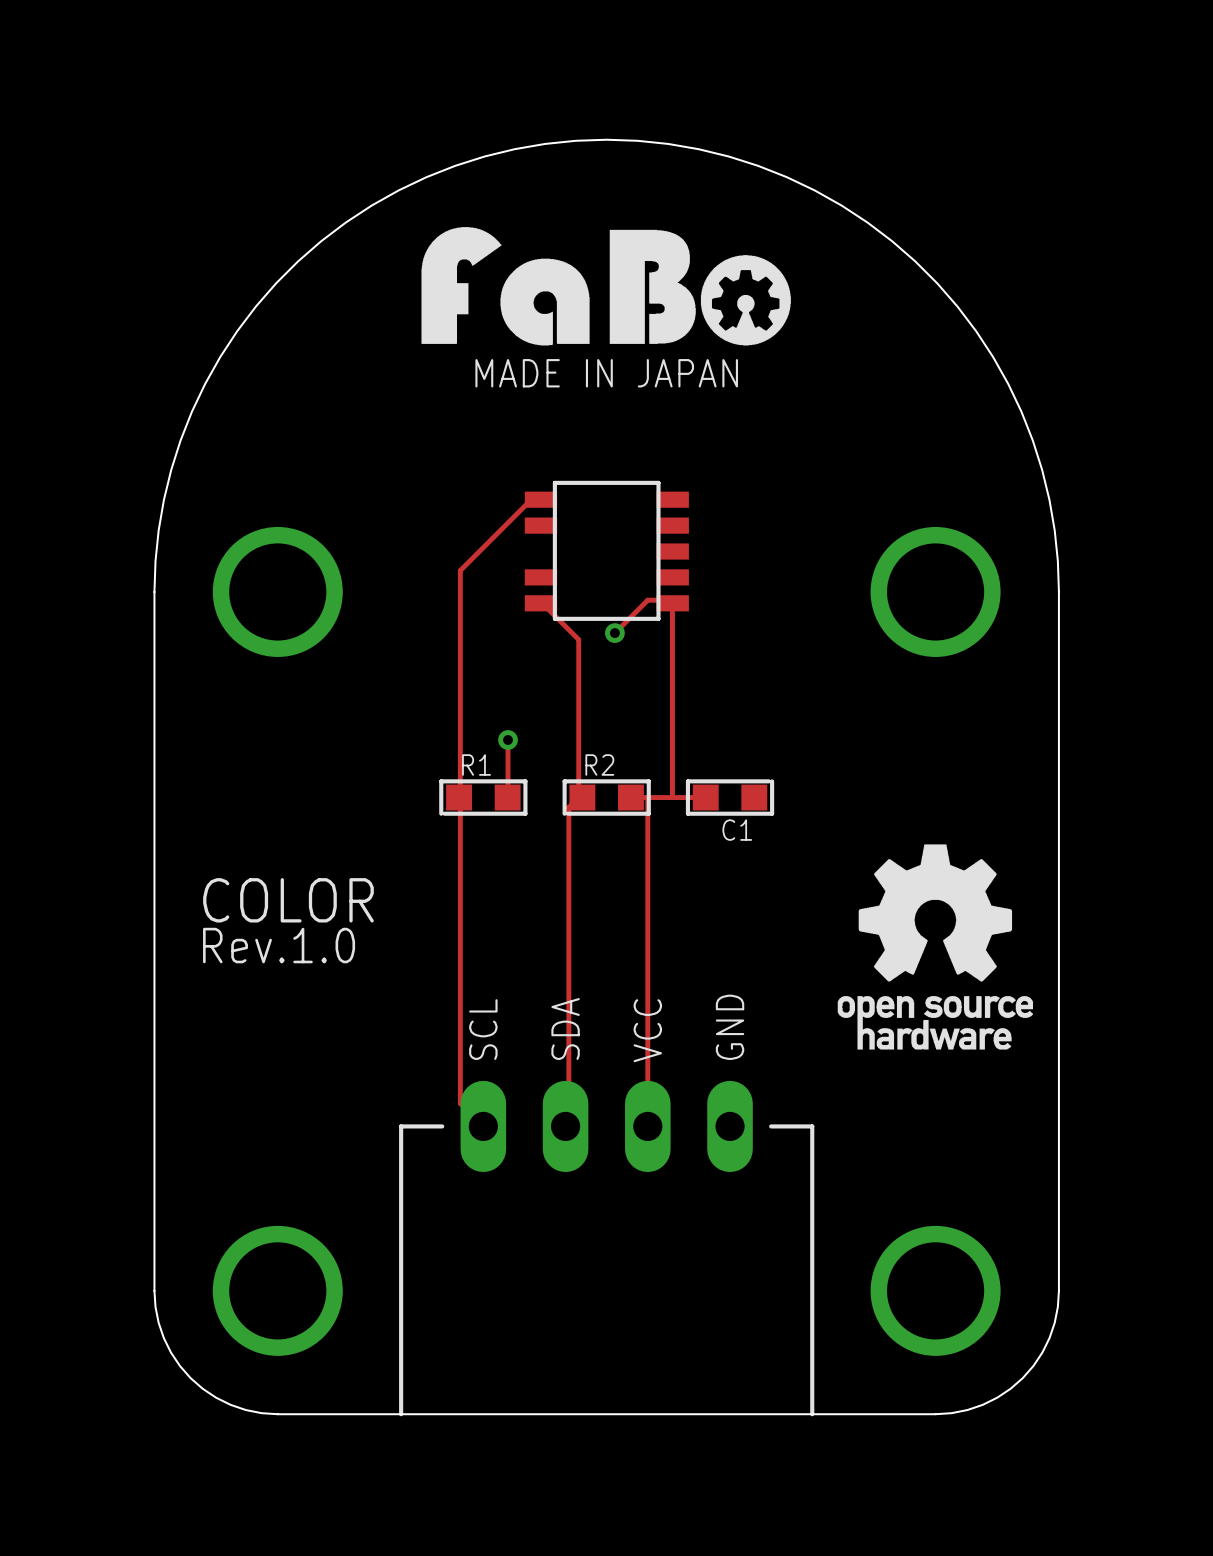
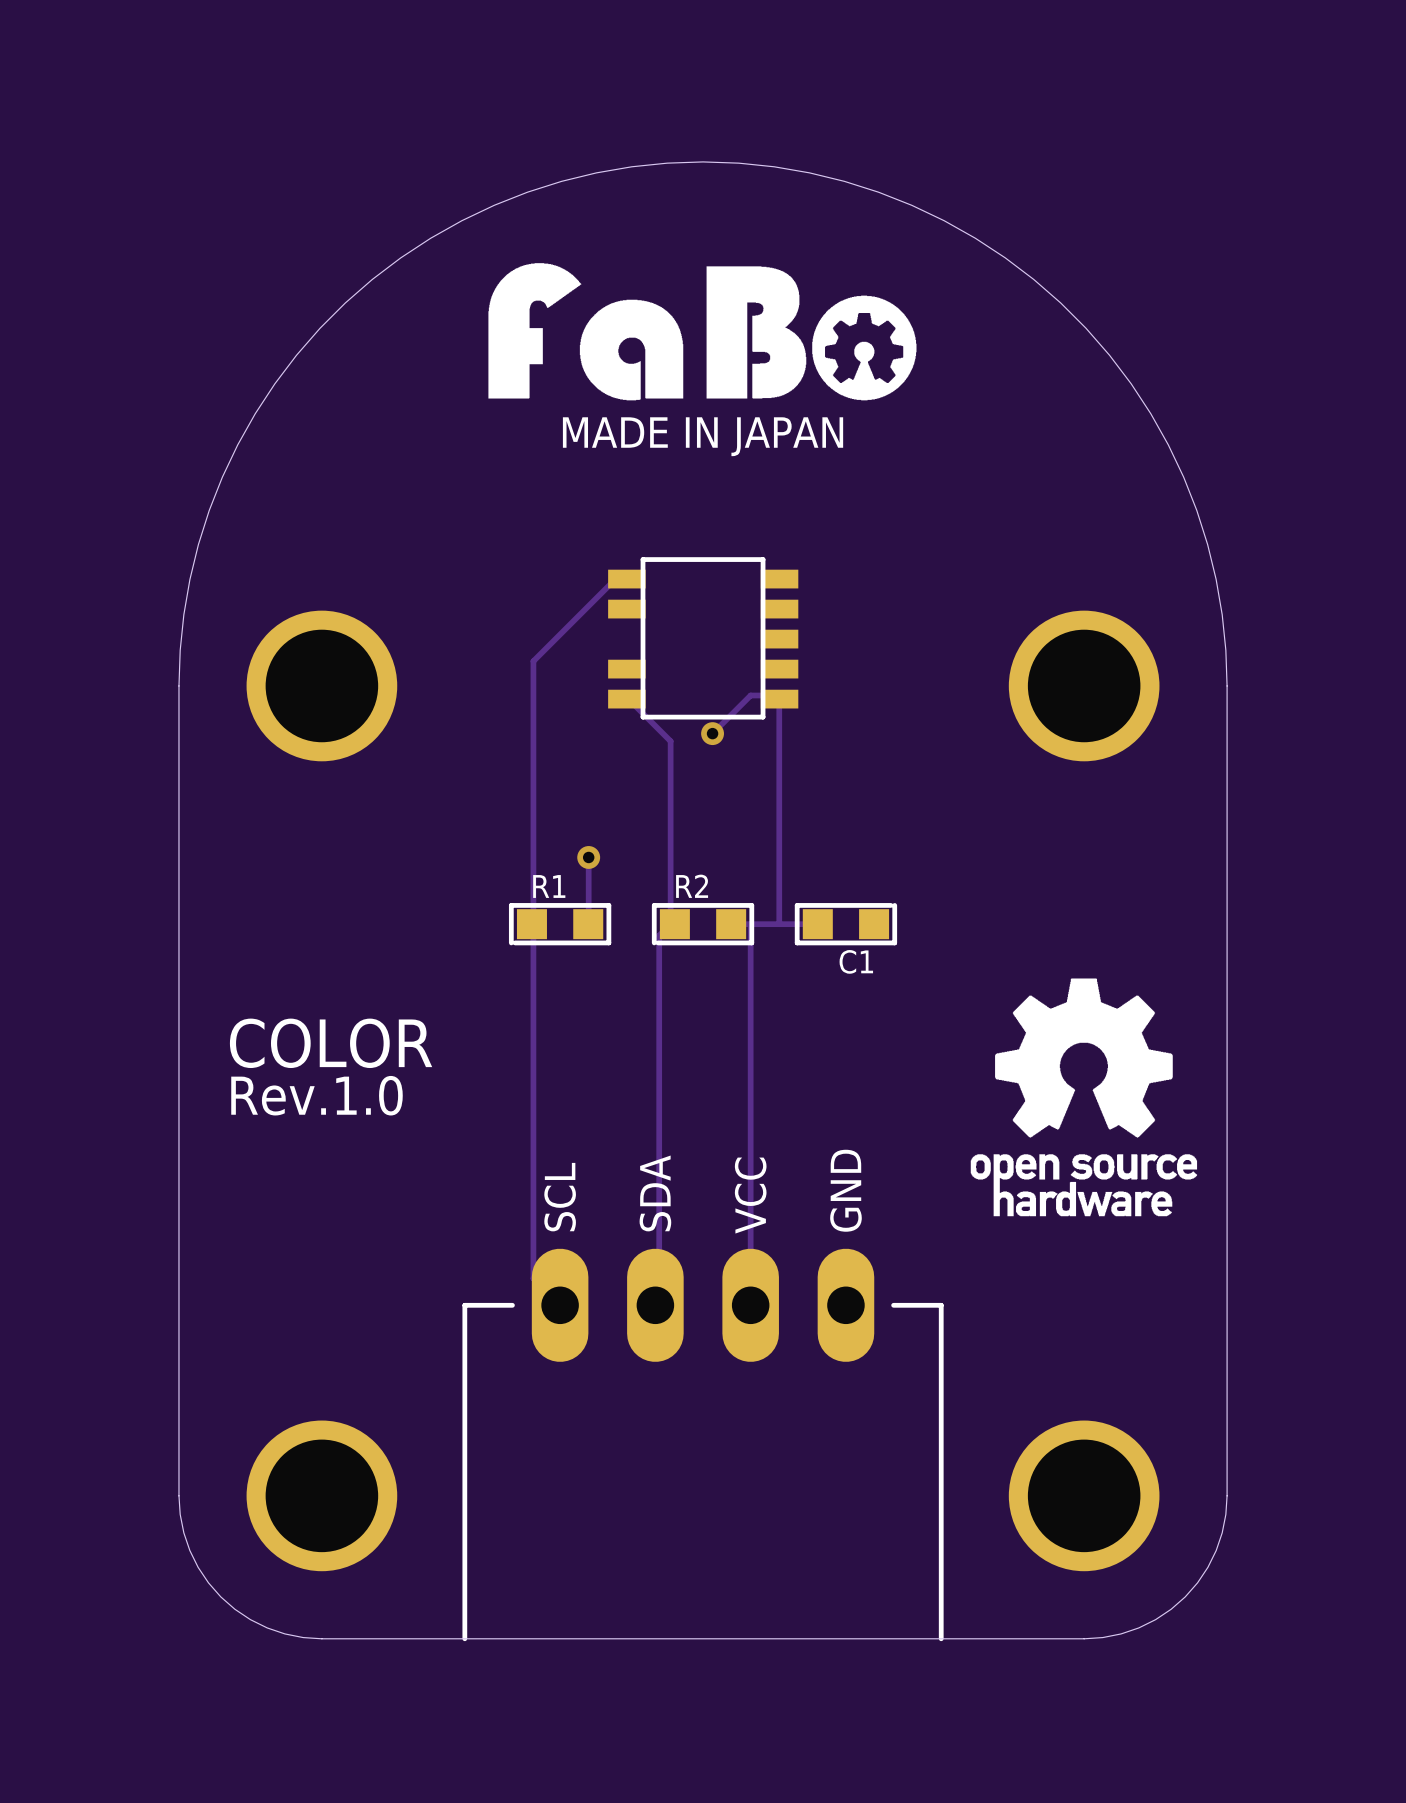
part footprint: [154, 139, 1059, 1417] -> [178, 161, 1228, 1642]

